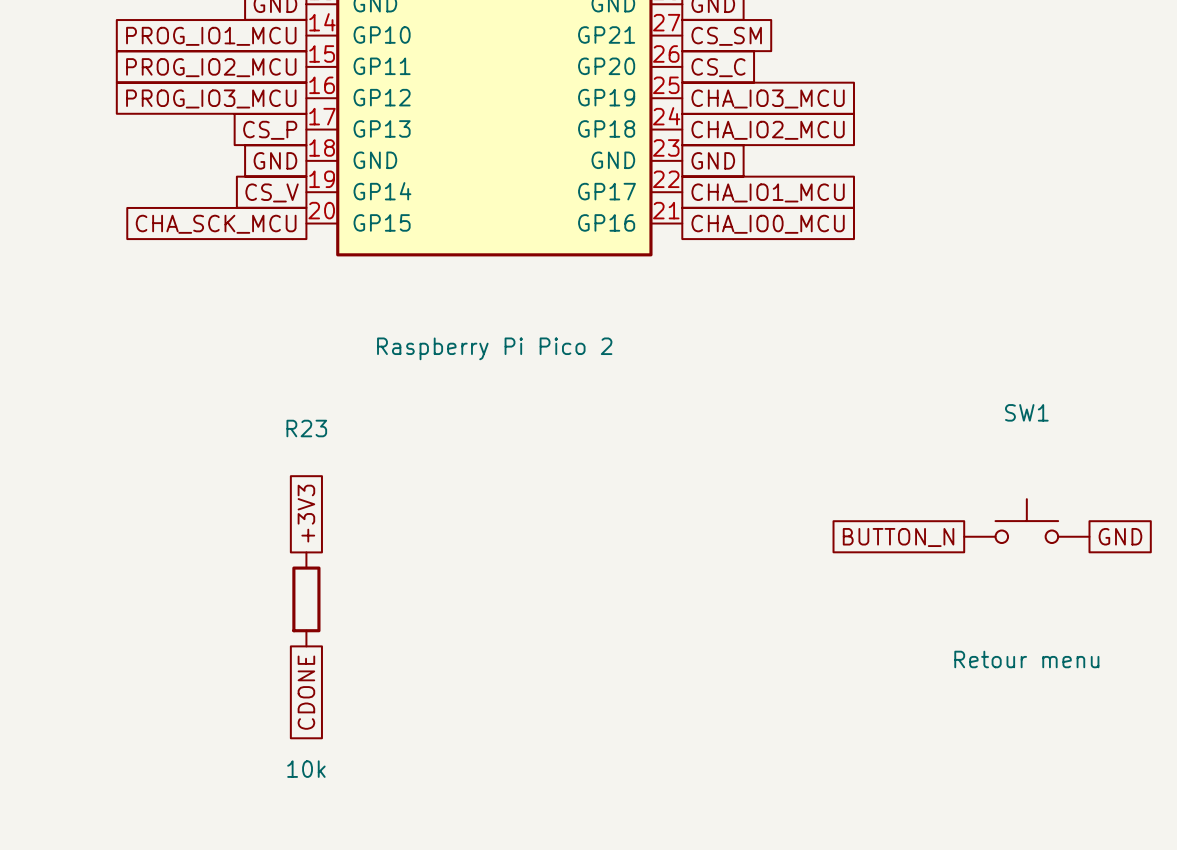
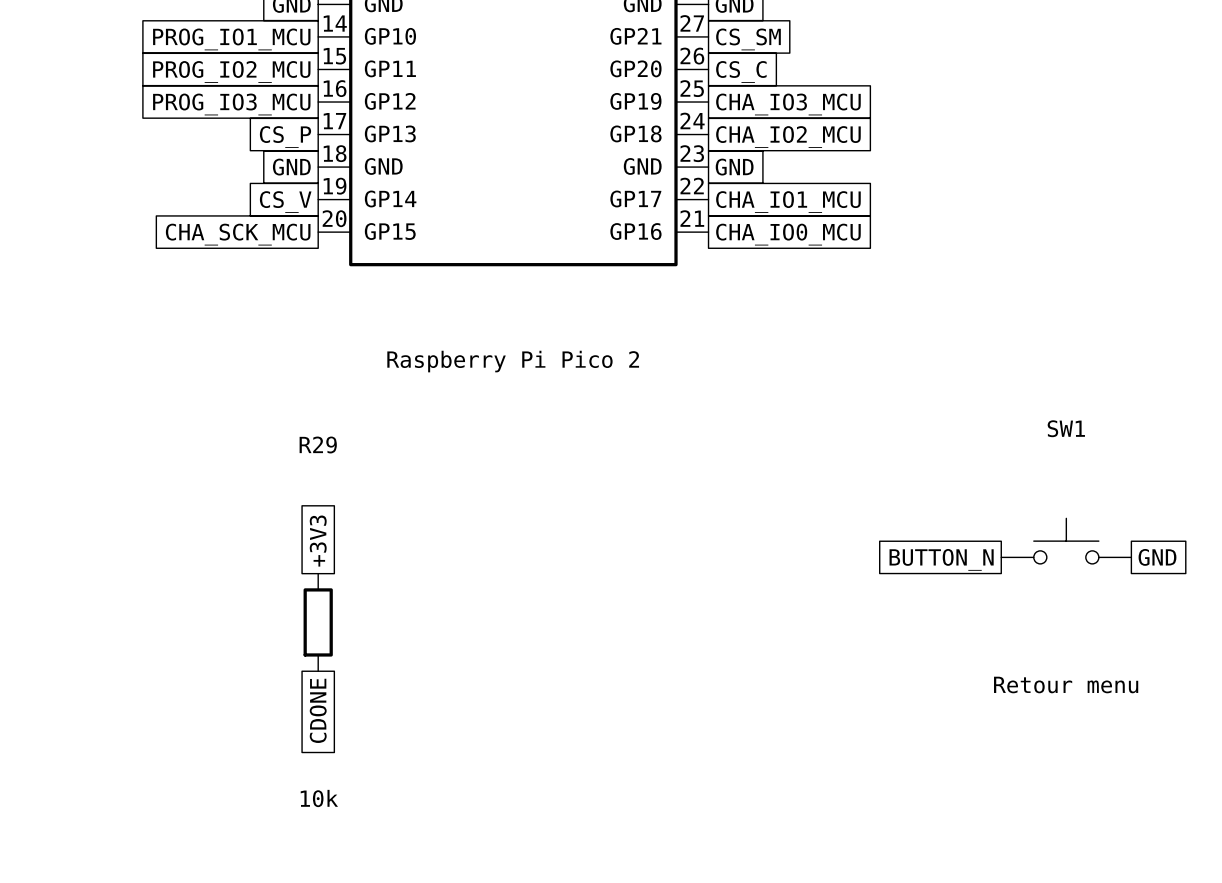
R23 name: R23 (306, 428) -> R29 (318, 444)

